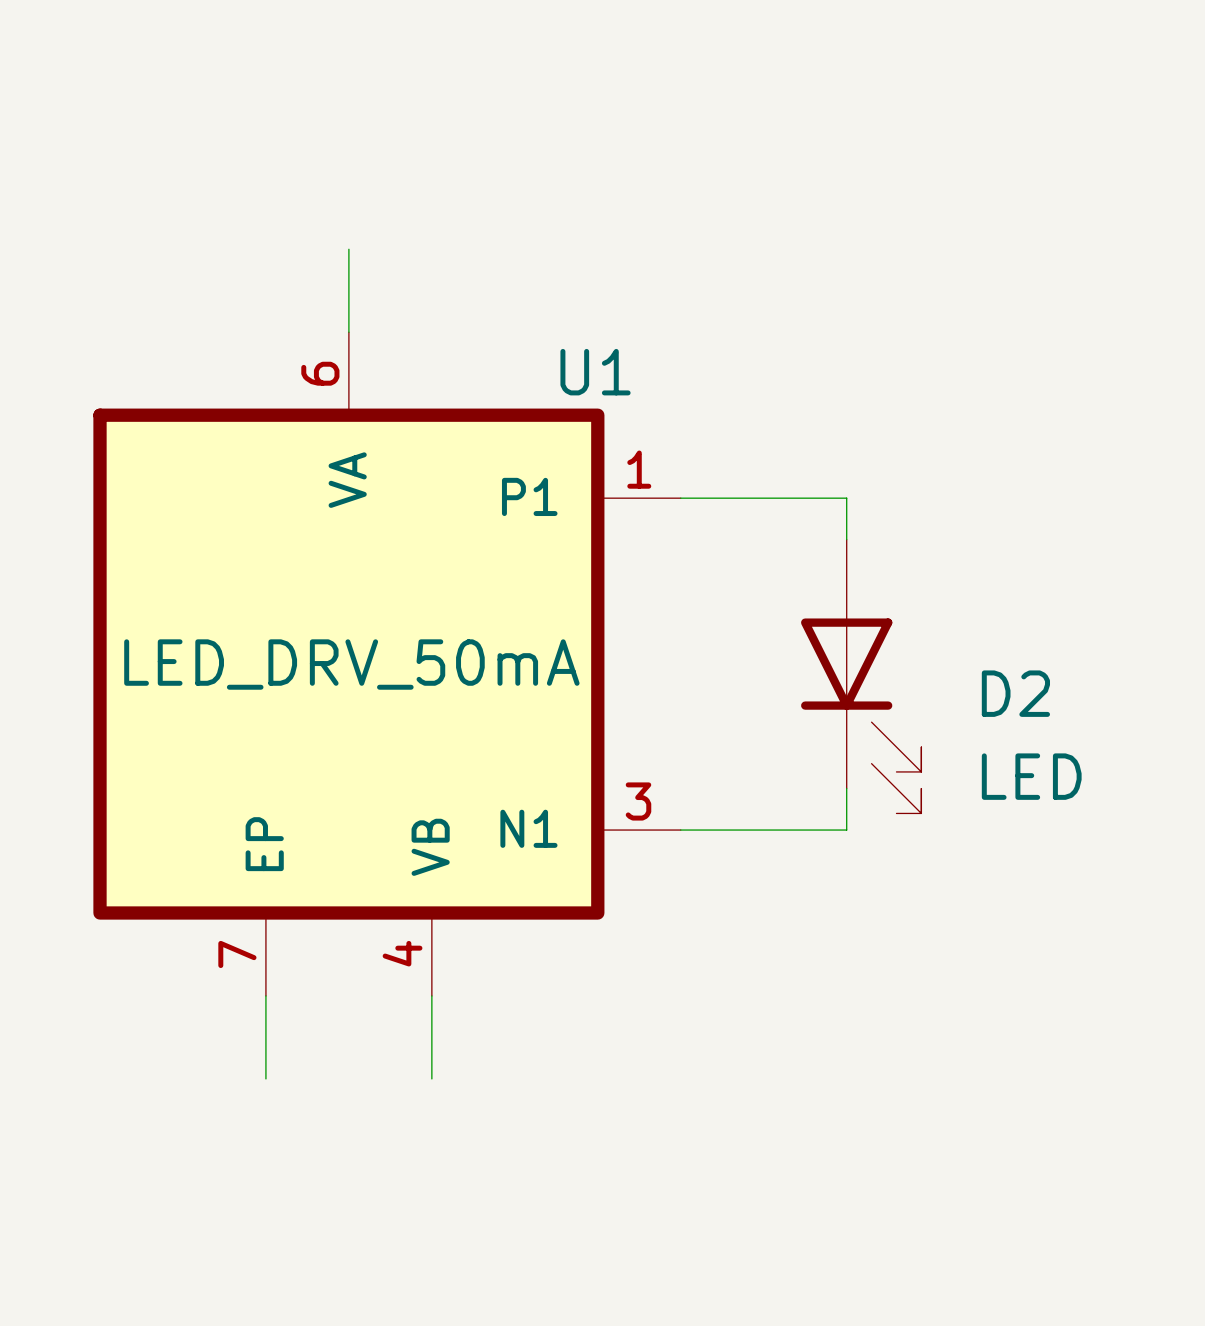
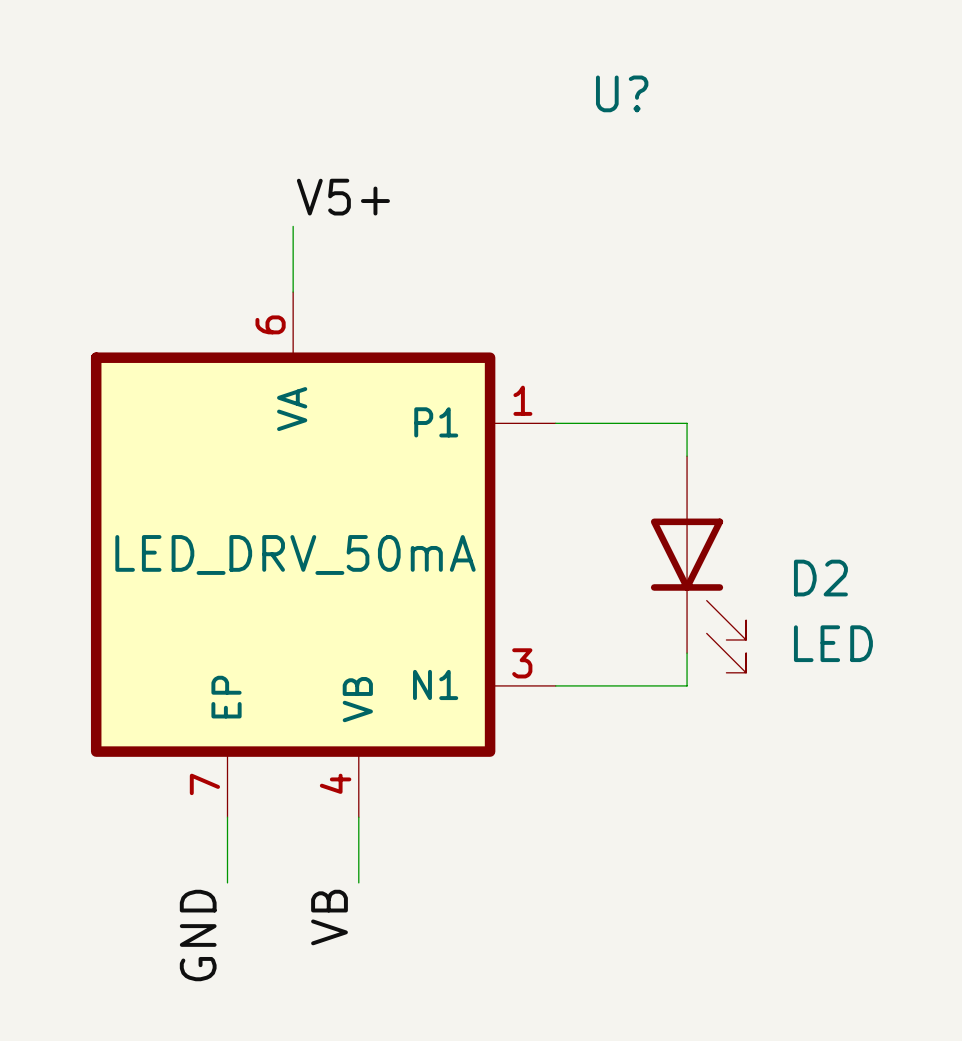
label: none -> V5+ (343, 197)
U1 name: U1 (595, 372) -> U? (622, 93)
label: none -> VB (329, 917)
label: none -> GND (198, 935)

